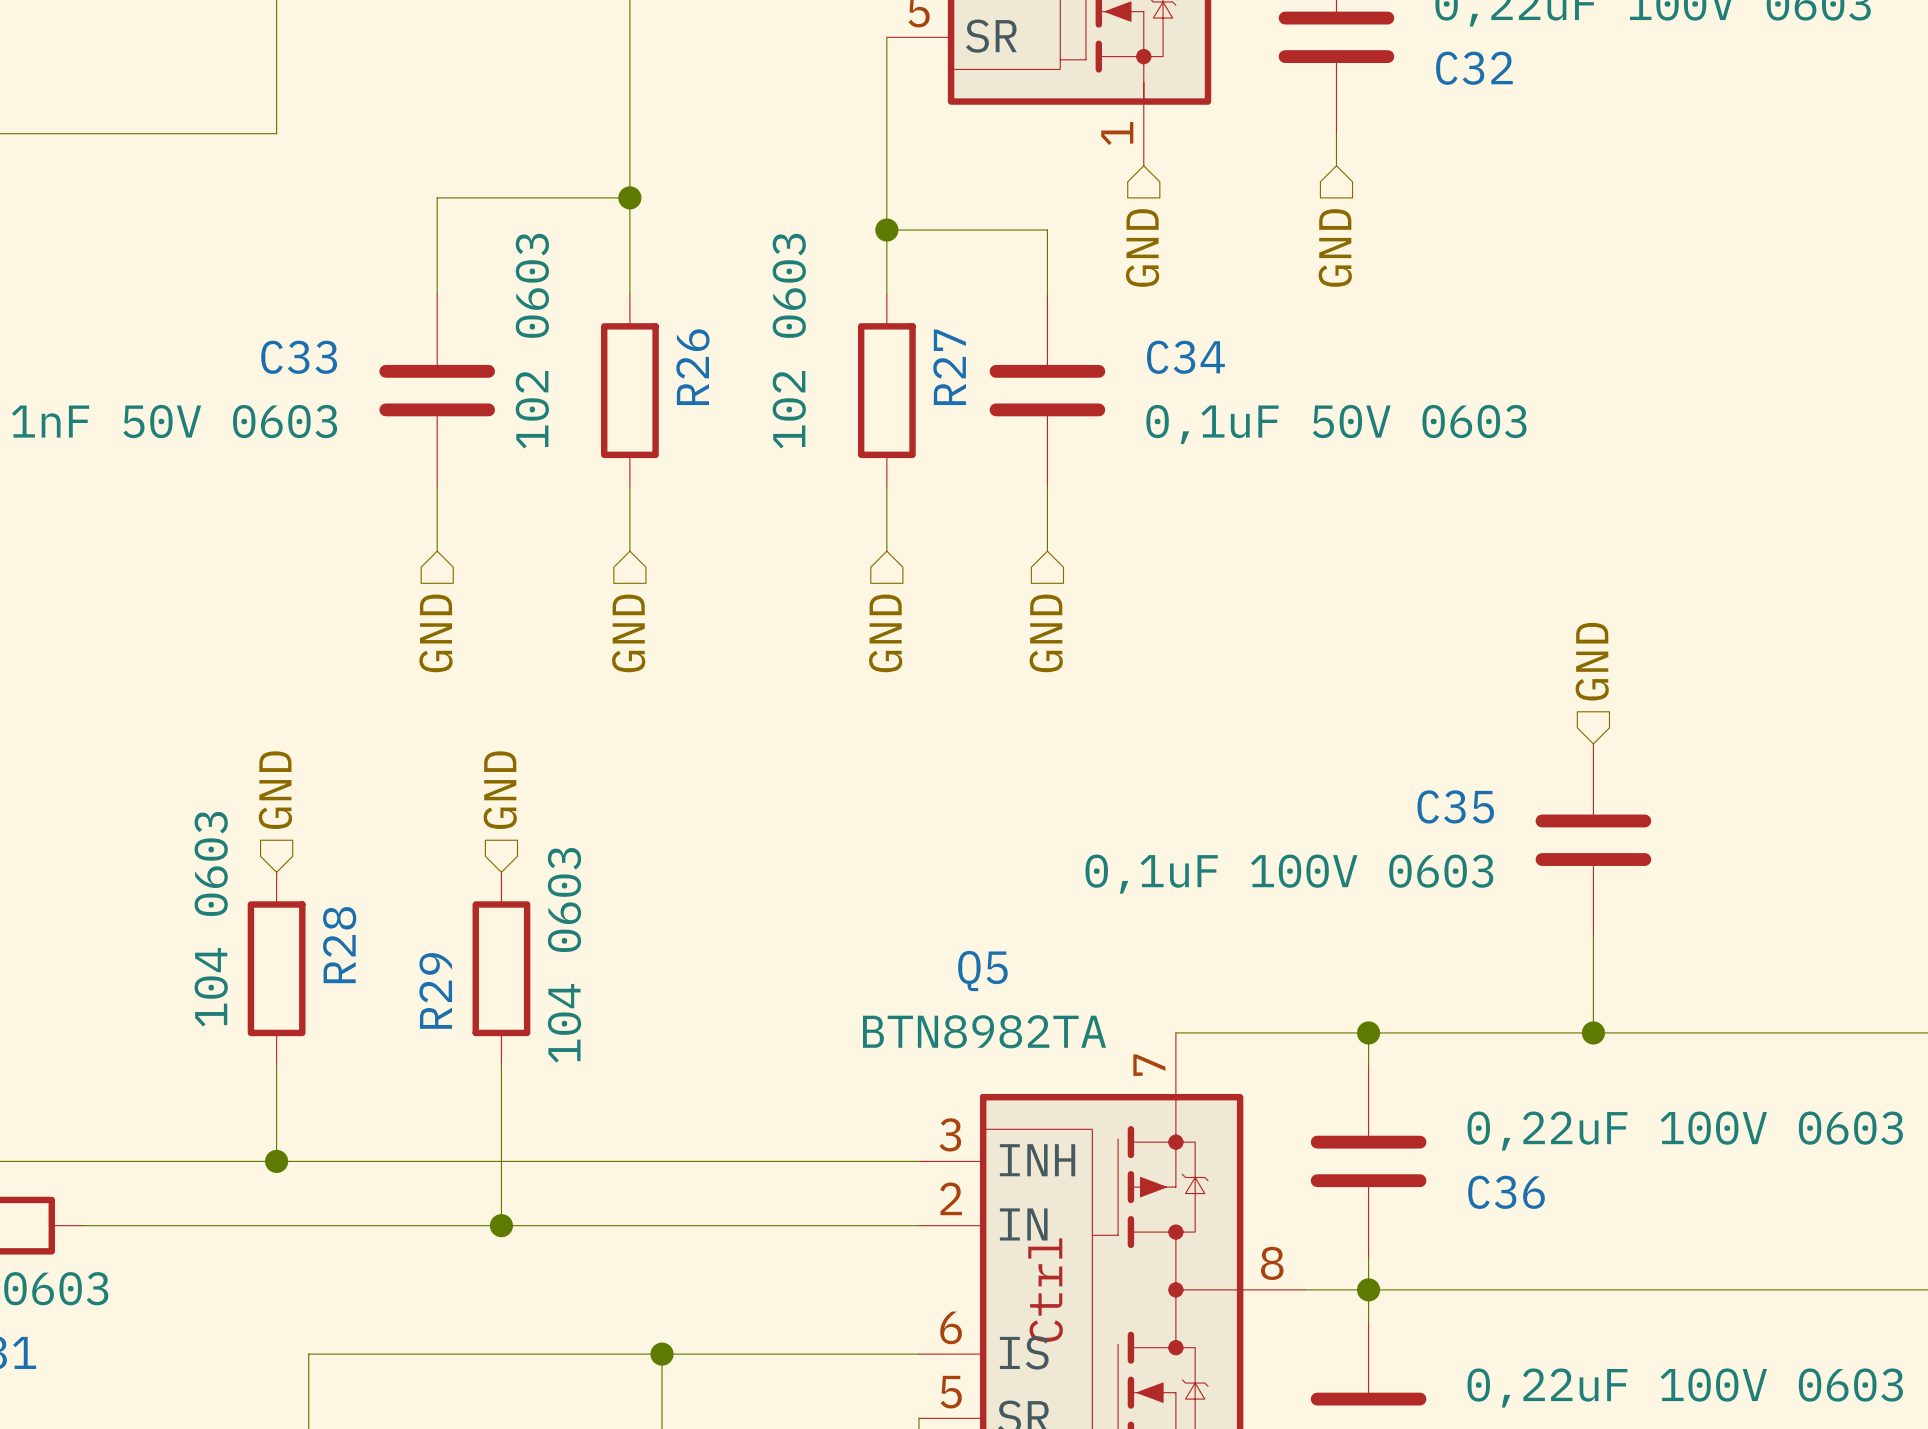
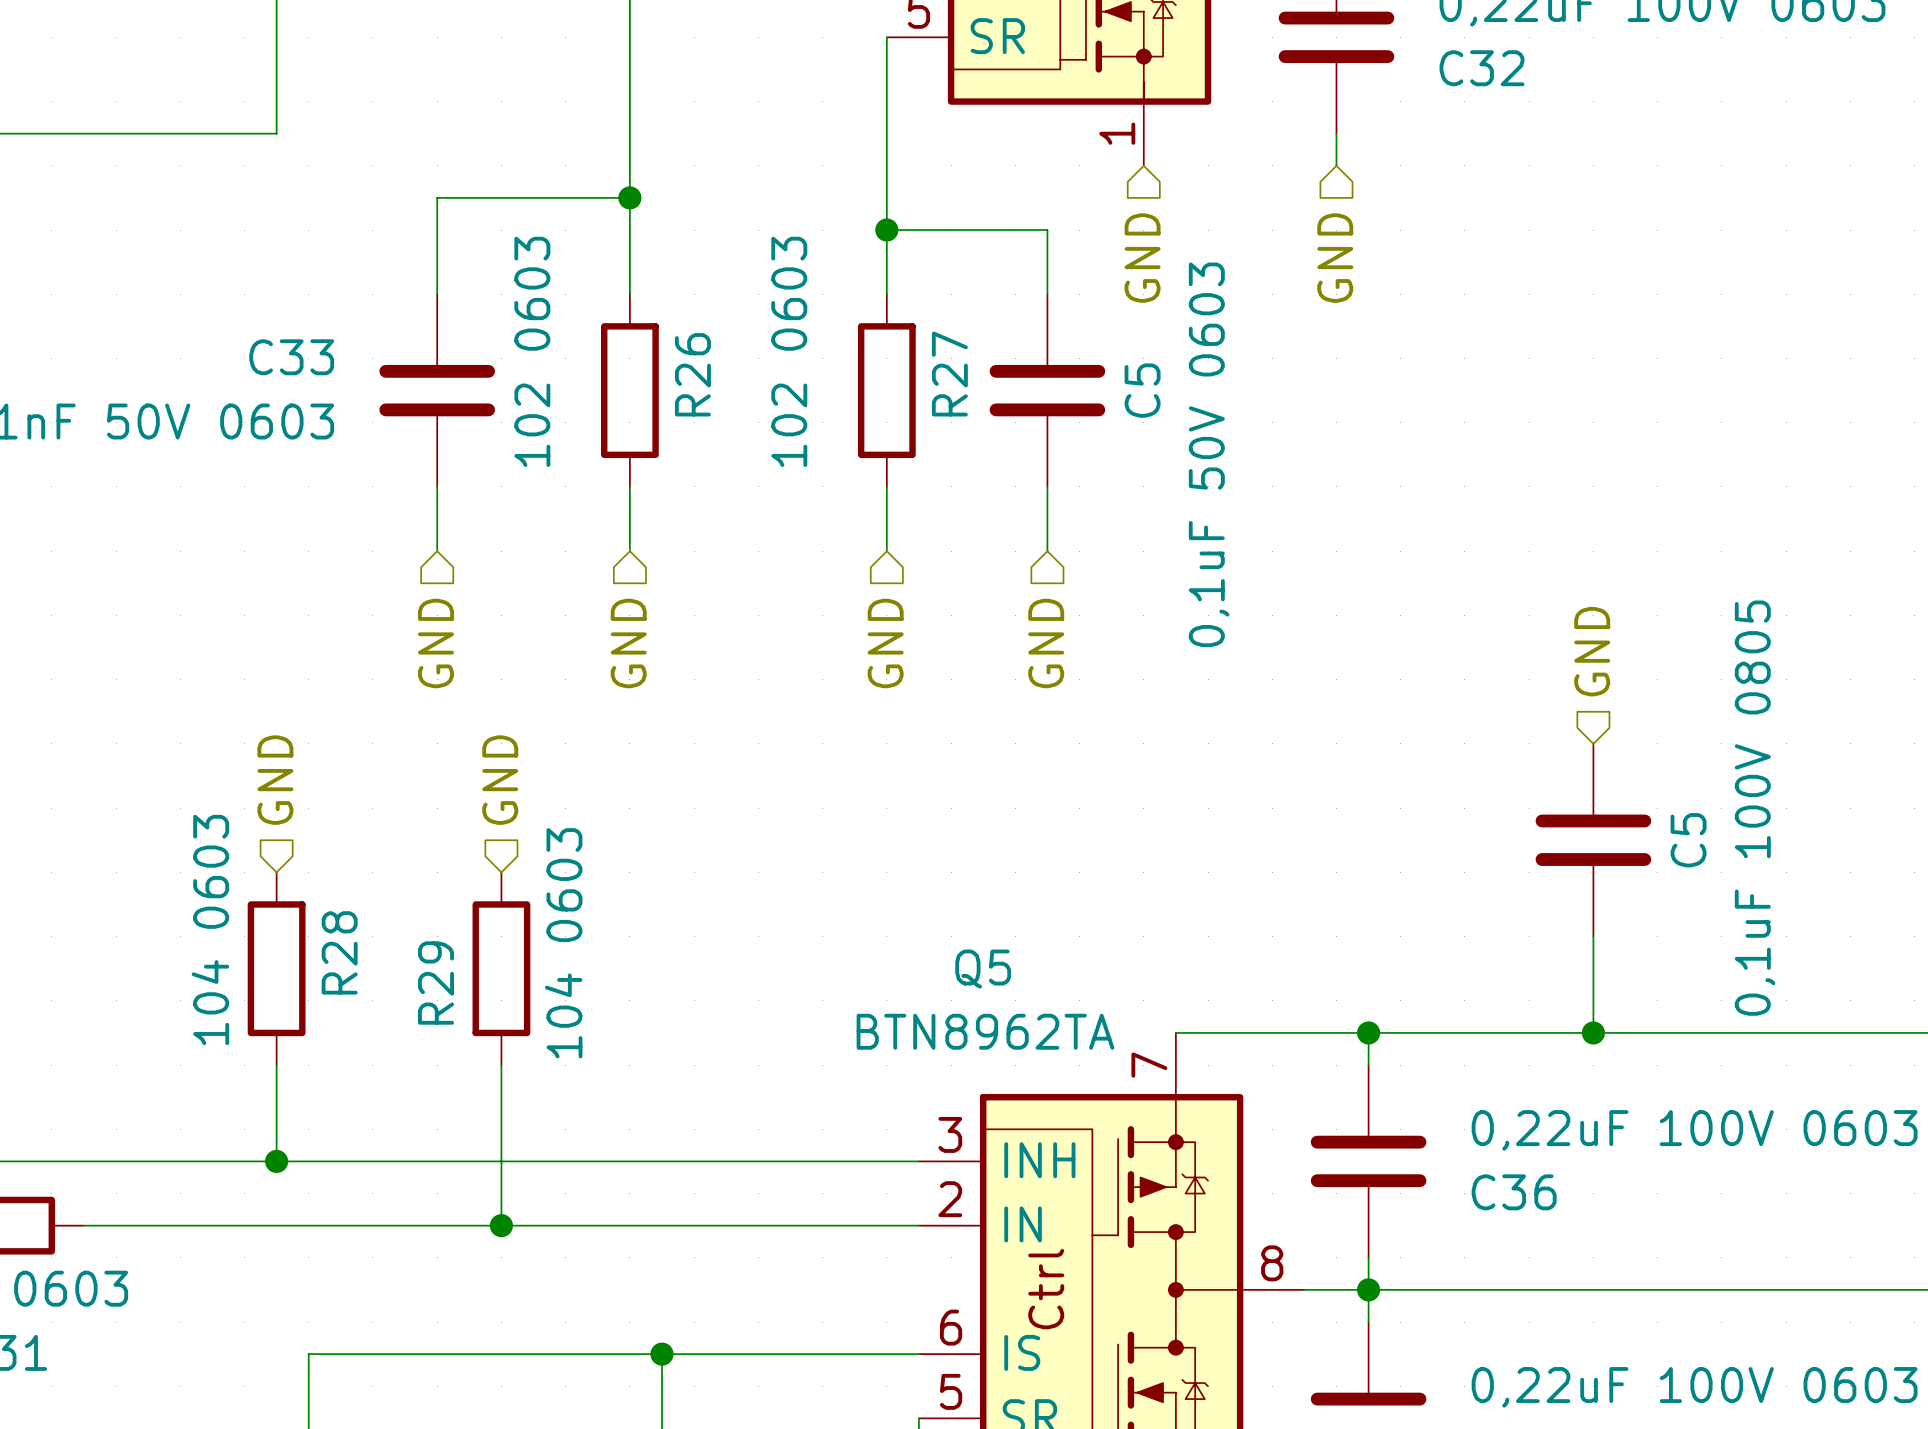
C34 name: C34 (1185, 357) -> C5 (1142, 390)
C34 value rotation: 0° (1336, 424) -> 90° counterclockwise (1209, 454)
C35 name: C35 (1455, 806) -> C5 (1688, 840)
C35 value: 0,1uF 100V 0603 (1289, 874) -> 0,1uF 100V 0805 (1755, 808)
Q5 value: BTN8982TA (984, 1031) -> BTN8962TA (985, 1031)

